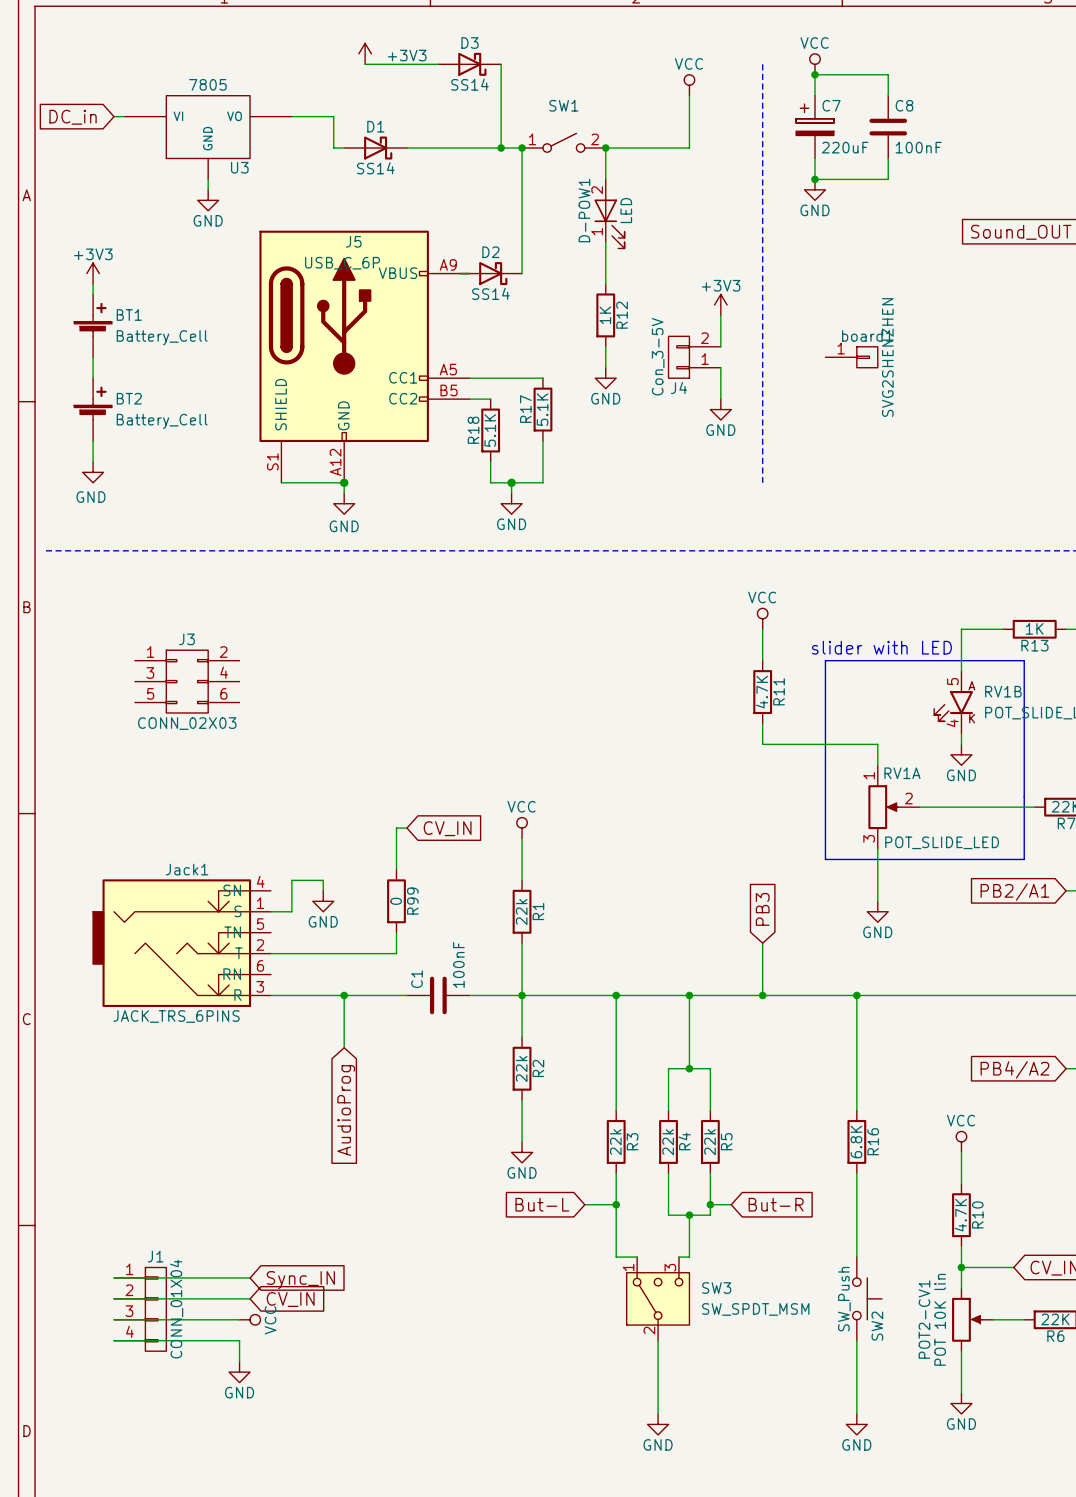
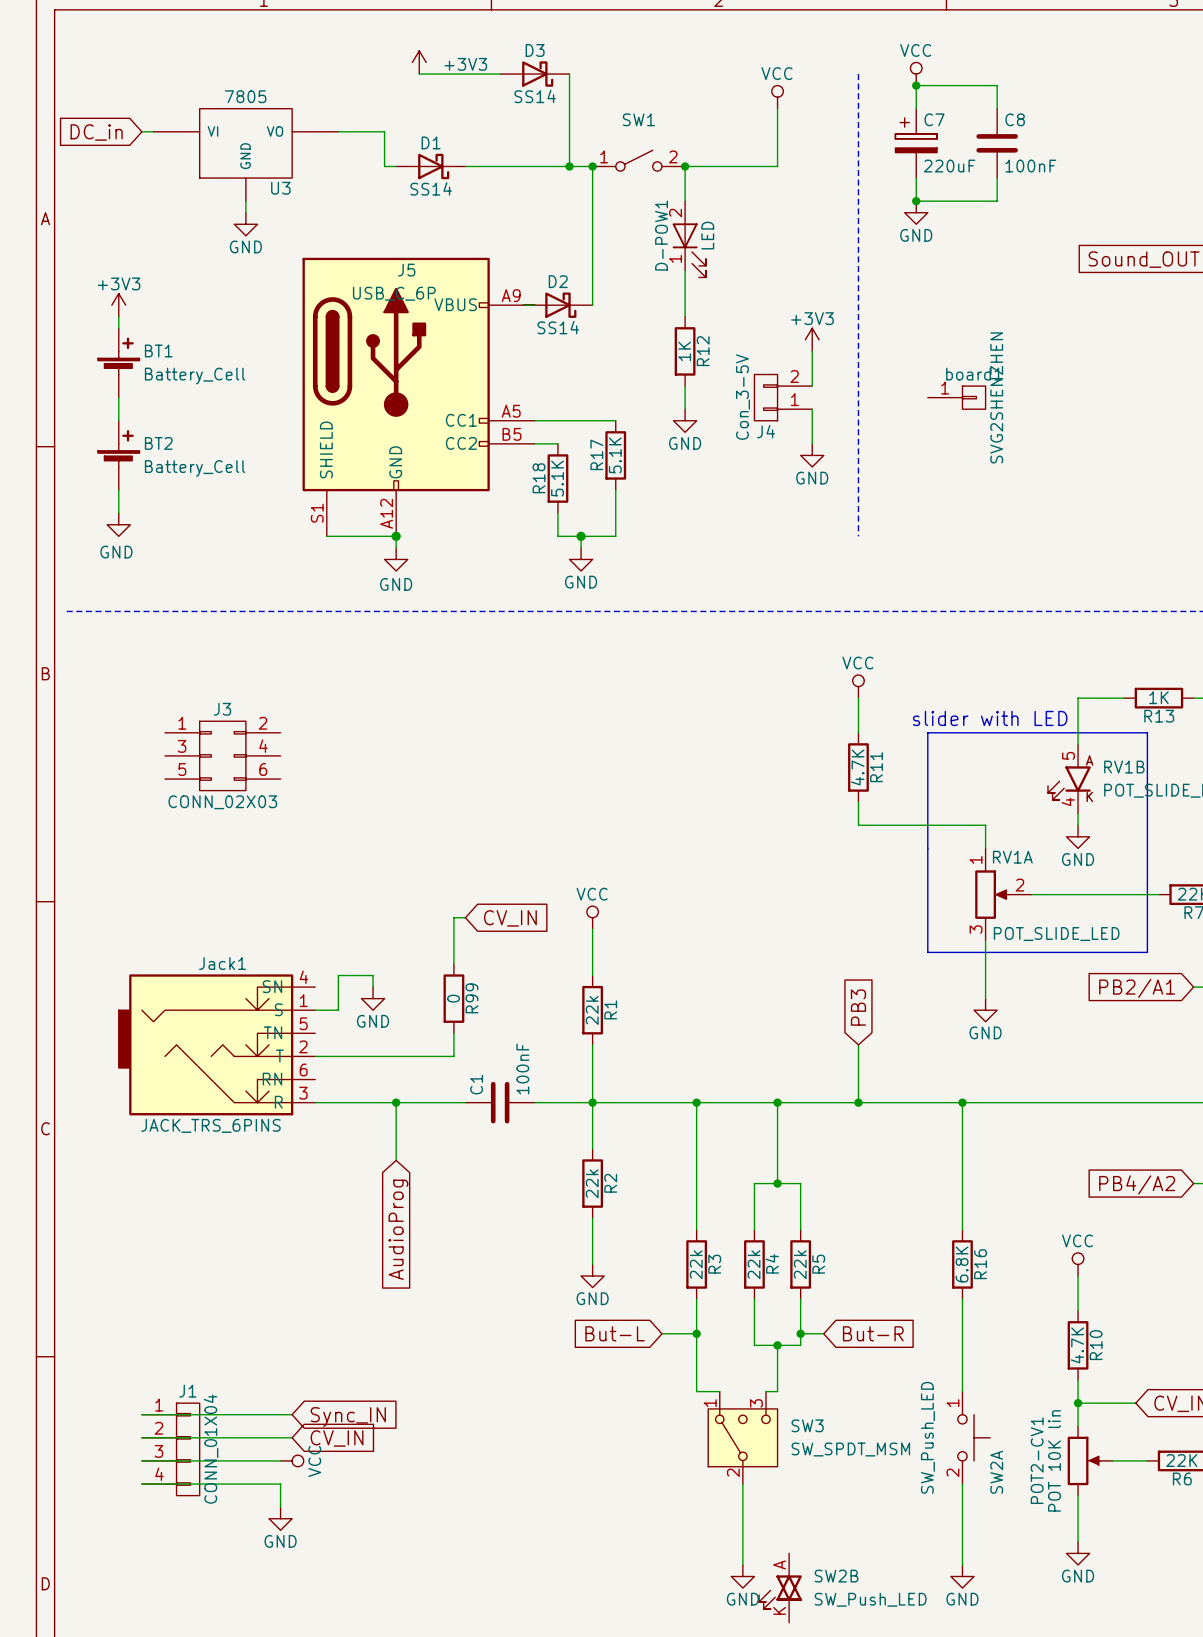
SW2 pin number: none -> 1 (952, 1403)
SW2 value: SW_Push (844, 1299) -> SW_Push_LED (927, 1437)
SW2 name: SW2 (877, 1326) -> SW2A (996, 1472)
SW2 pin number: none -> 2 (952, 1472)
SW2B: none -> SW_Push_LED (780, 1588)

